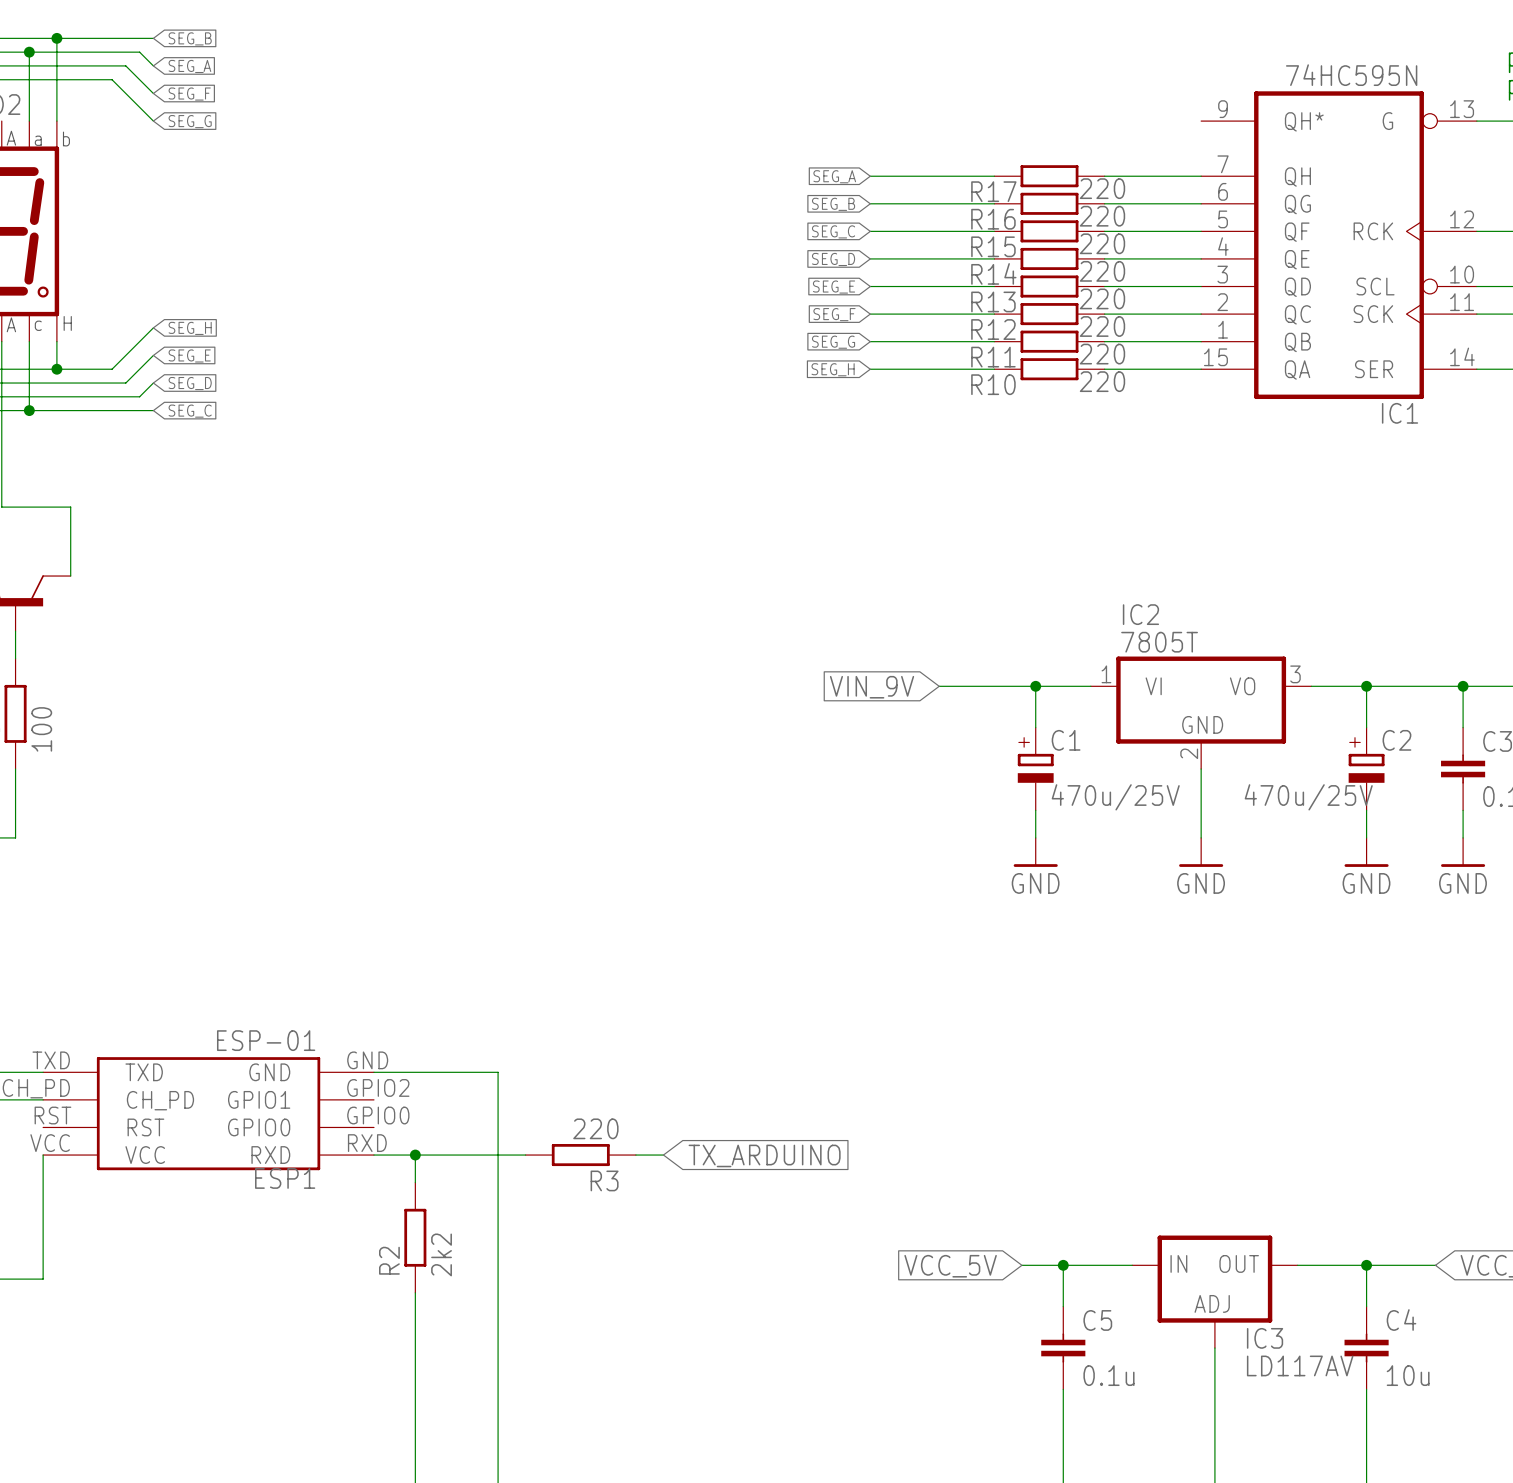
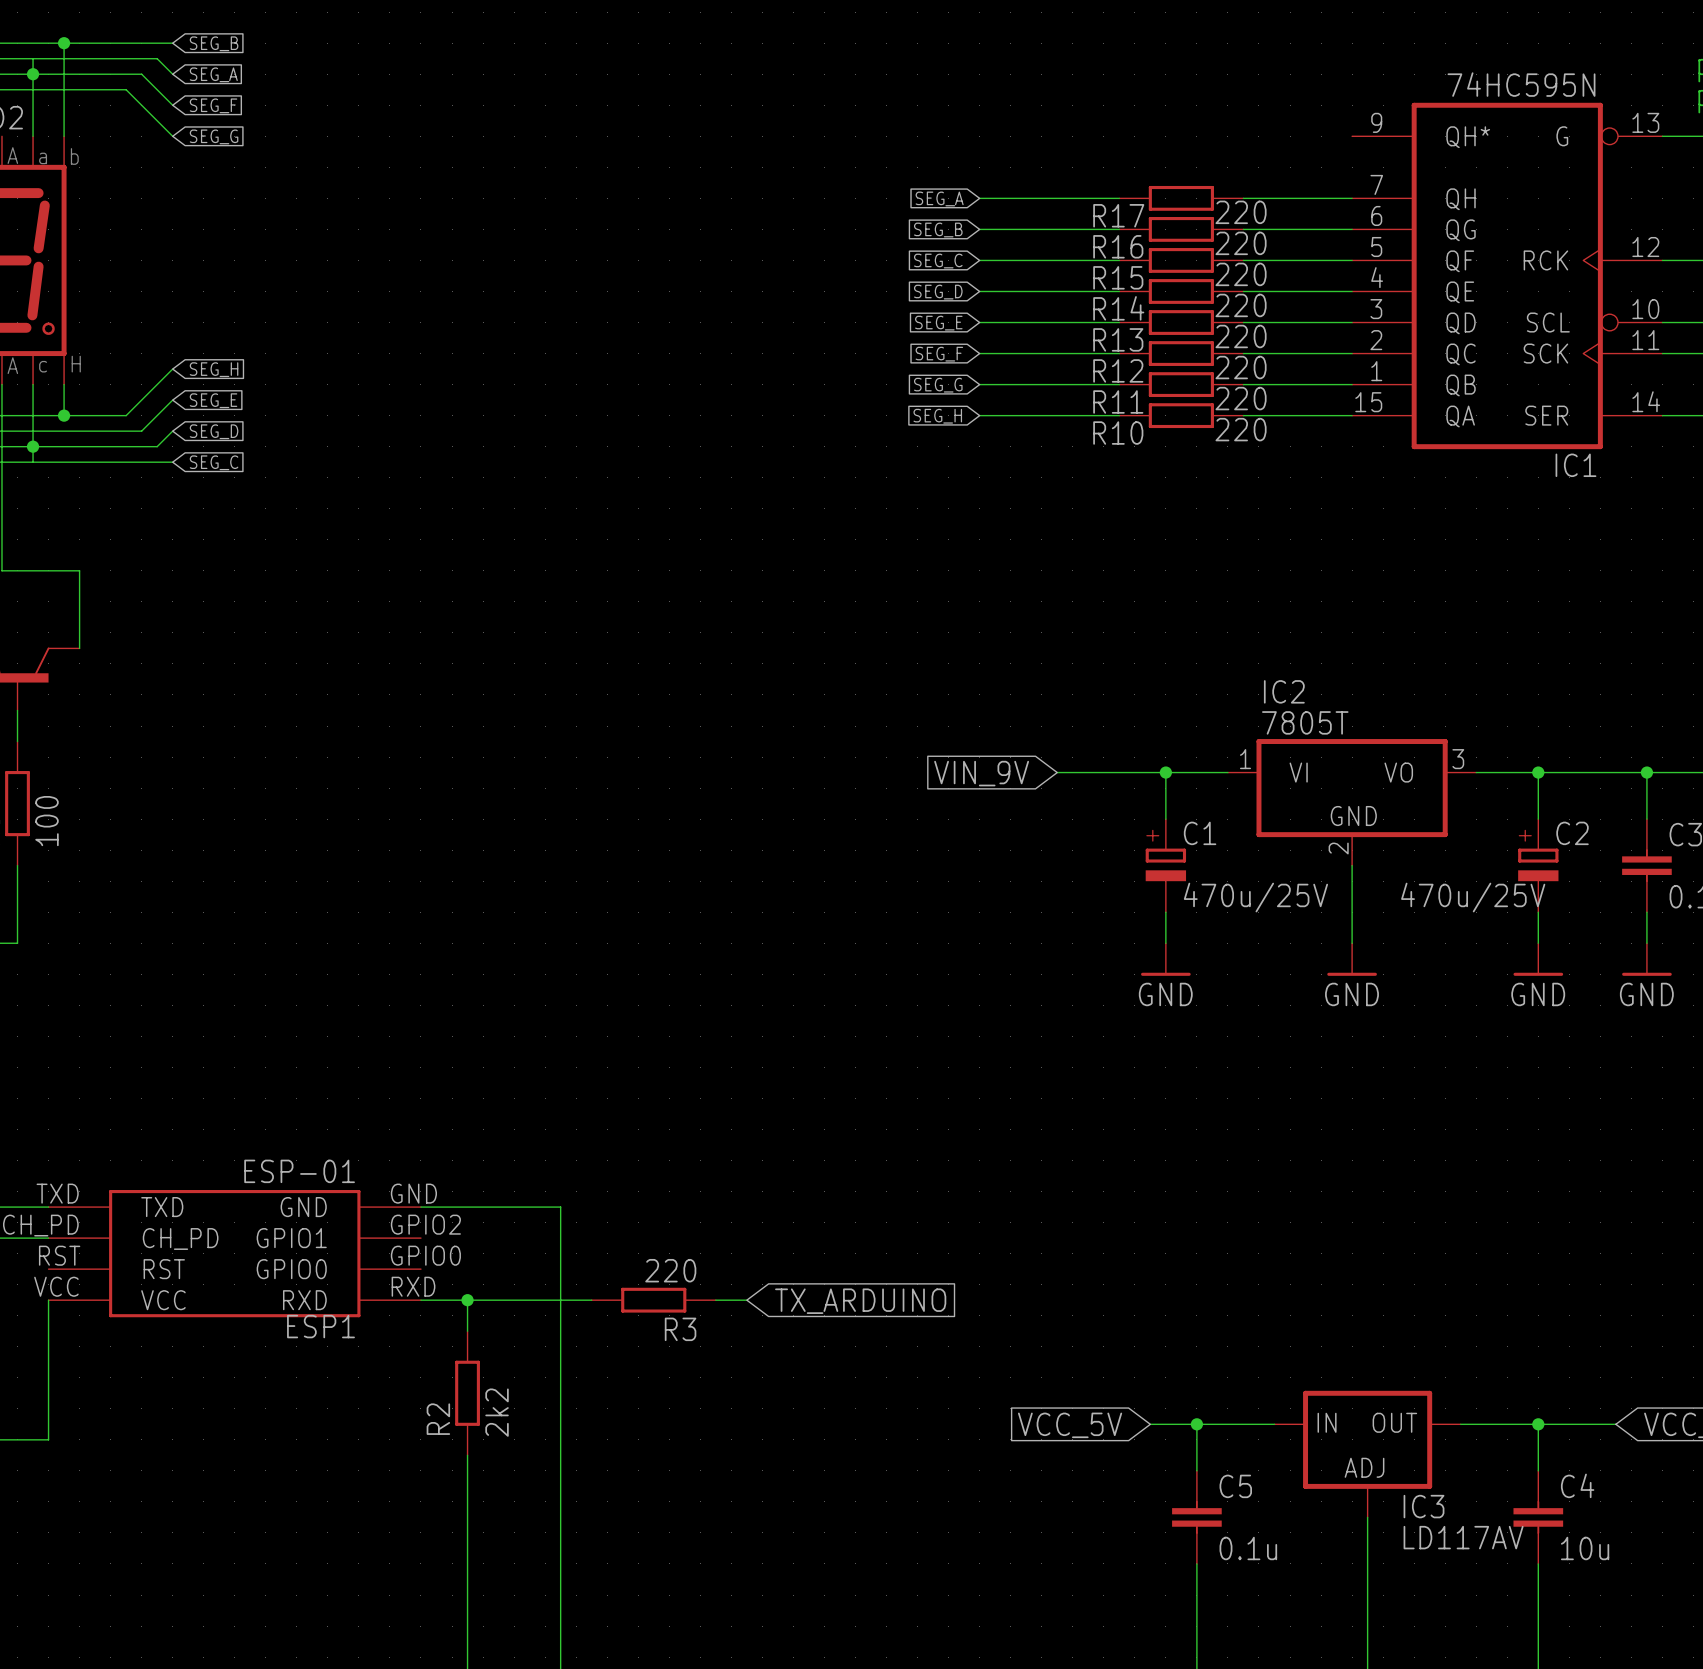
junction position: (29, 52) -> (33, 74)
junction position: (29, 410) -> (33, 446)

